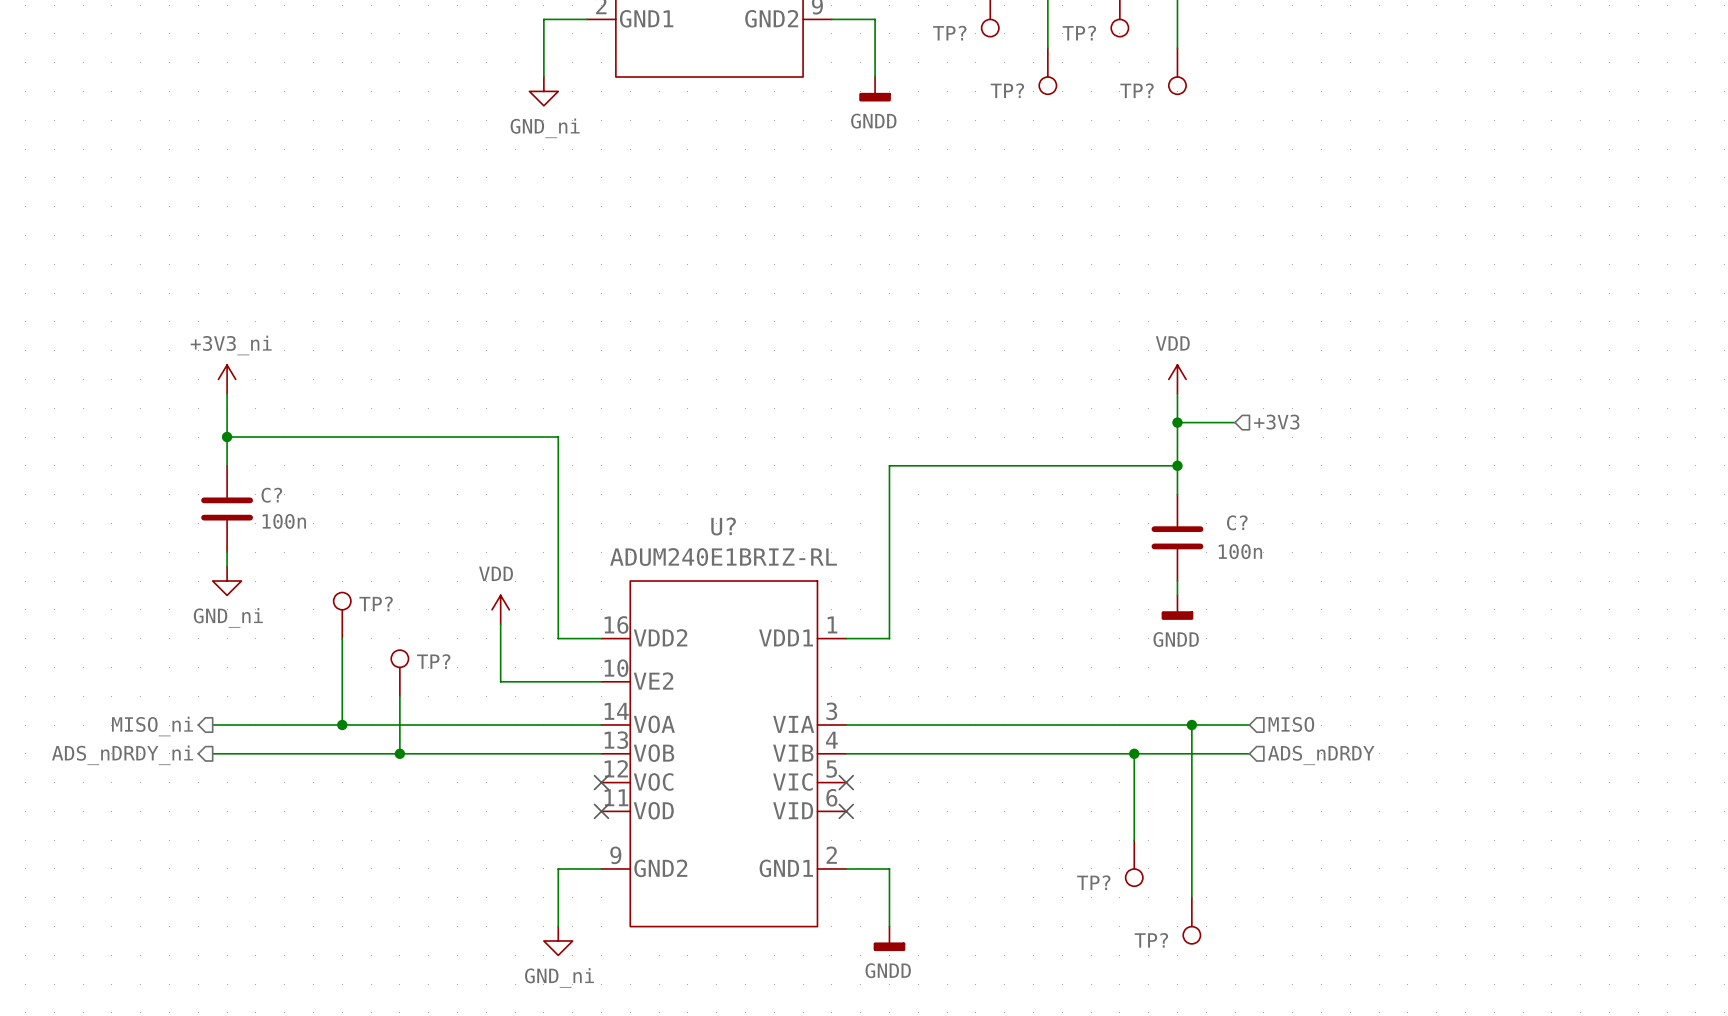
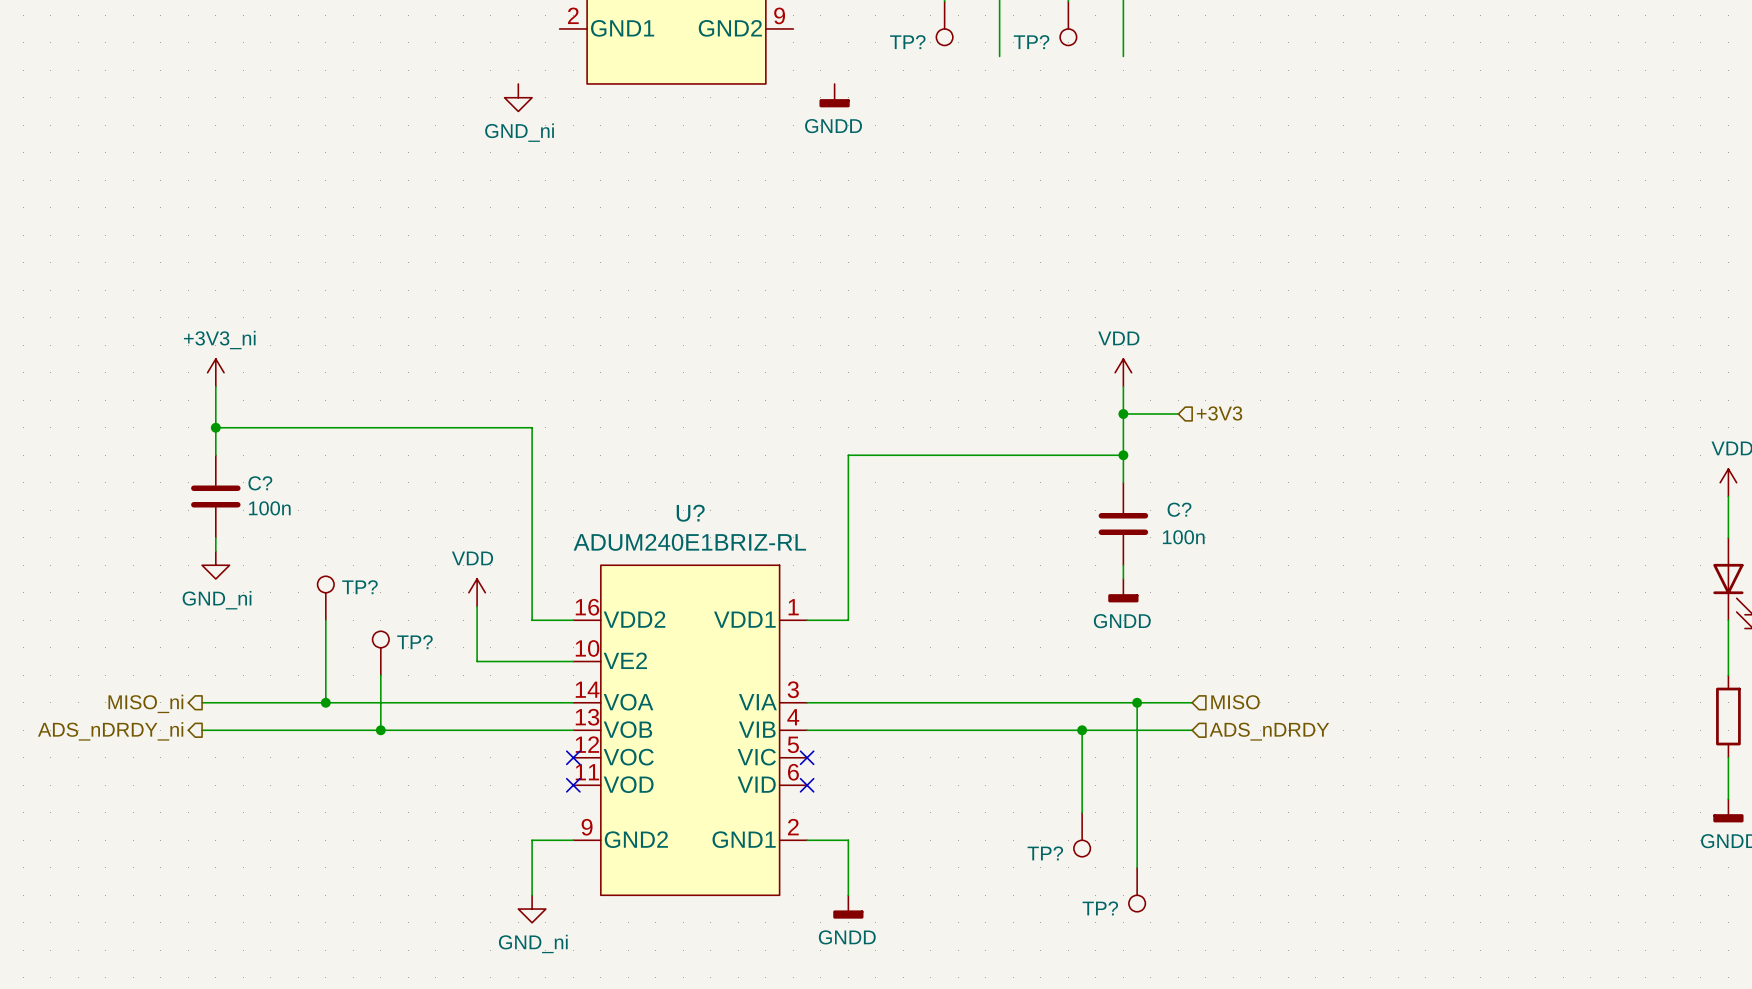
wire: (587, 19) (543, 19) (543, 77) -> none
wire: (831, 19) (875, 19) (875, 77) -> none
TP?: (1047, 71) -> none
TP?: (1177, 71) -> none

